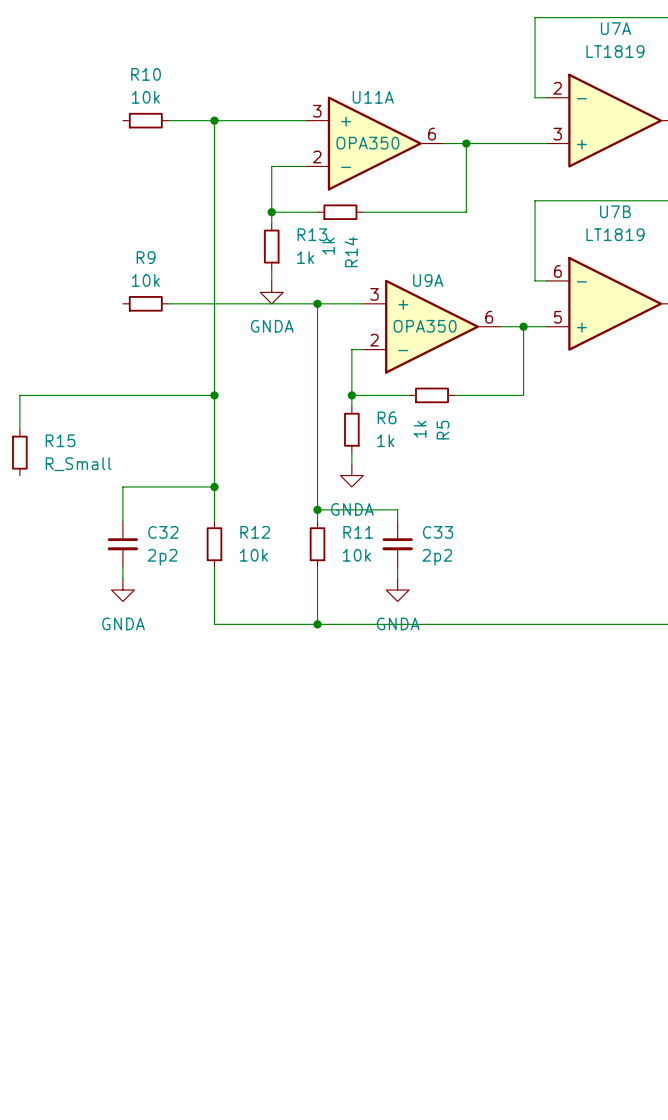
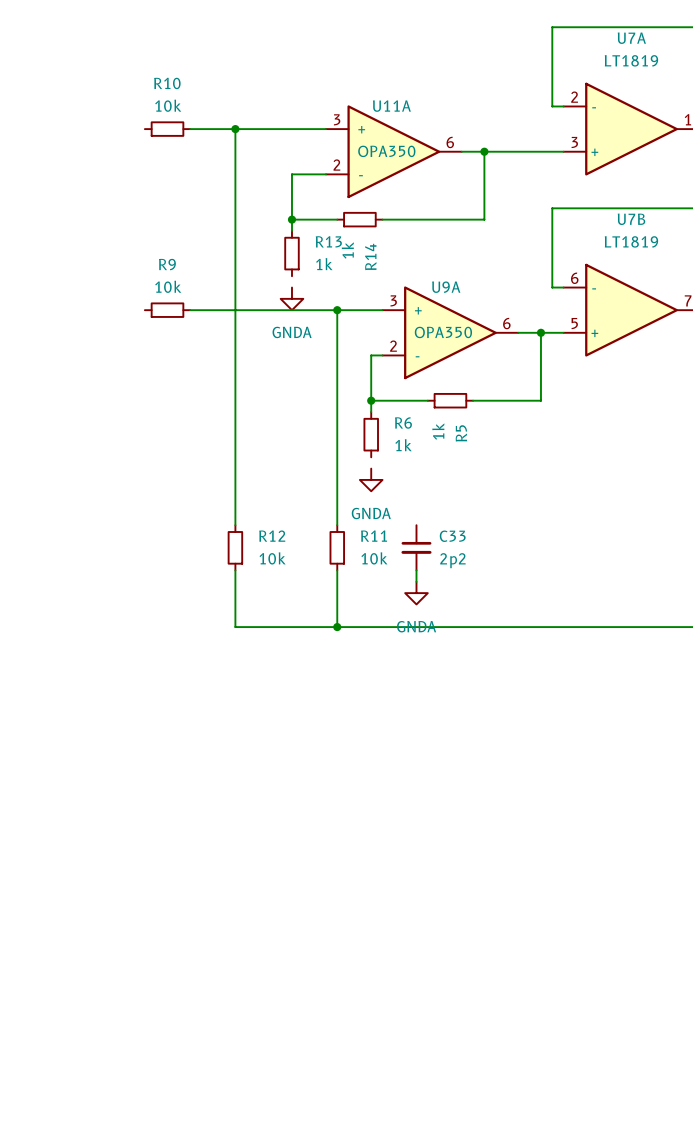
wire: (271, 269) (271, 280) -> none
wire: (214, 395) (19, 395) (19, 429) -> none
junction: (214, 395) -> none
R15: R_Small (19, 452) -> none
wire: (351, 452) (351, 464) -> none
wire: (214, 486) (122, 486) (122, 521) -> none
junction: (214, 486) -> none
wire: (317, 509) (397, 509) (397, 521) -> none
junction: (317, 509) -> none
C32: 2p2 (122, 544) -> none
wire: (122, 567) (122, 578) -> none
power symbol: GNDA (122, 590) -> none

